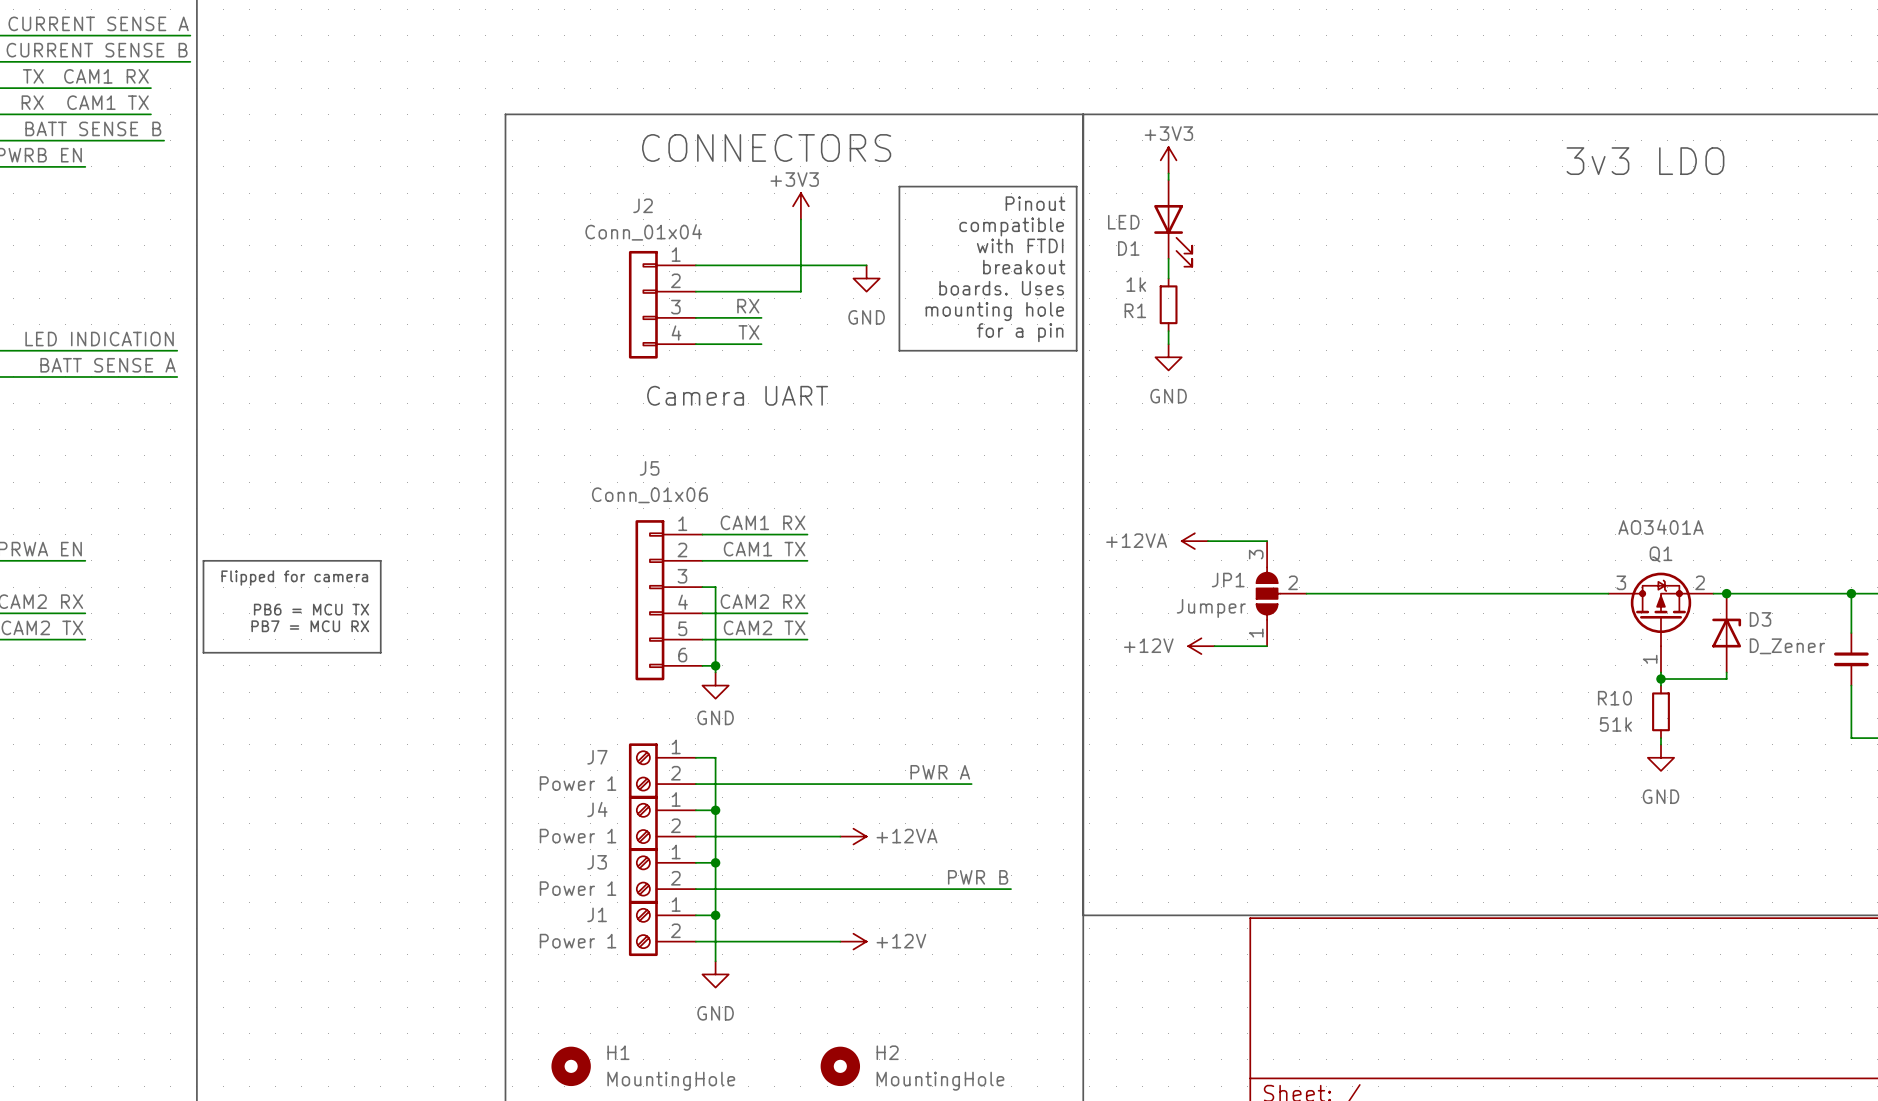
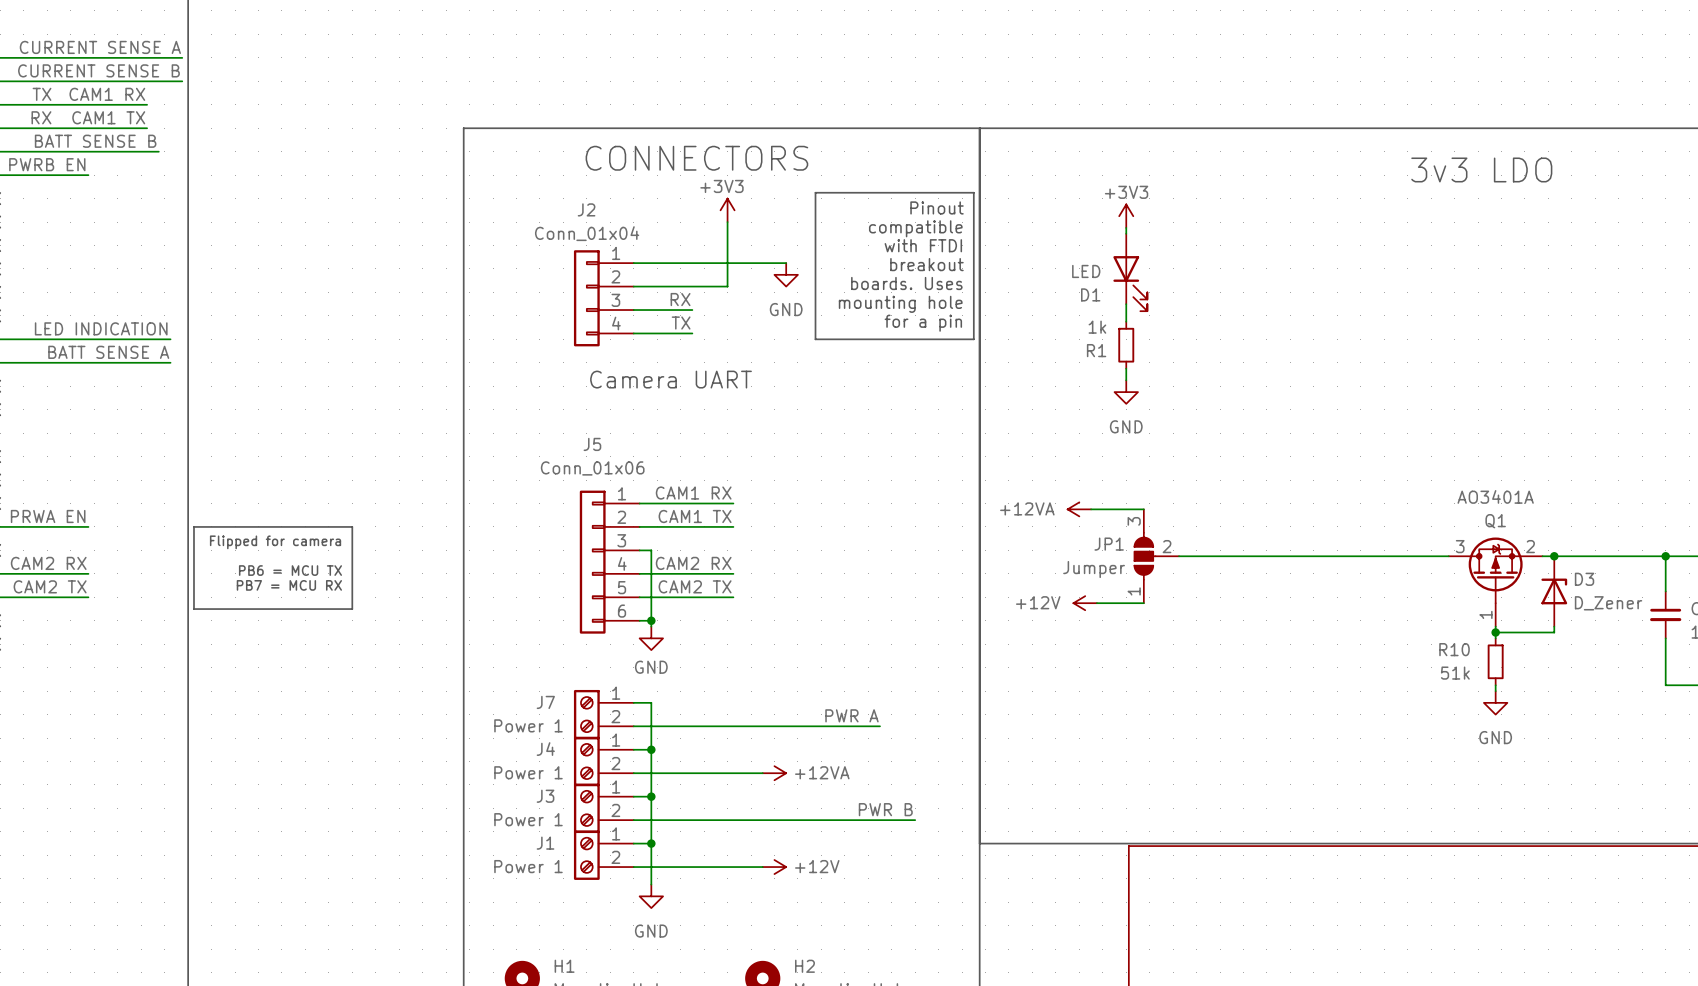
power symbol position: +3V3 (1168, 160) -> +3V3 (1126, 216)
wire: (1168, 173) (1168, 180) -> (1126, 227) (1126, 233)
D1 position: (1173, 223) -> (1130, 272)
wire: (1168, 258) (1168, 278) -> (1126, 304) (1126, 321)
R1 position: (1168, 304) -> (1126, 345)
wire: (1168, 331) (1168, 344) -> (1126, 368) (1126, 380)
power symbol position: GND (1168, 357) -> GND (1126, 392)

